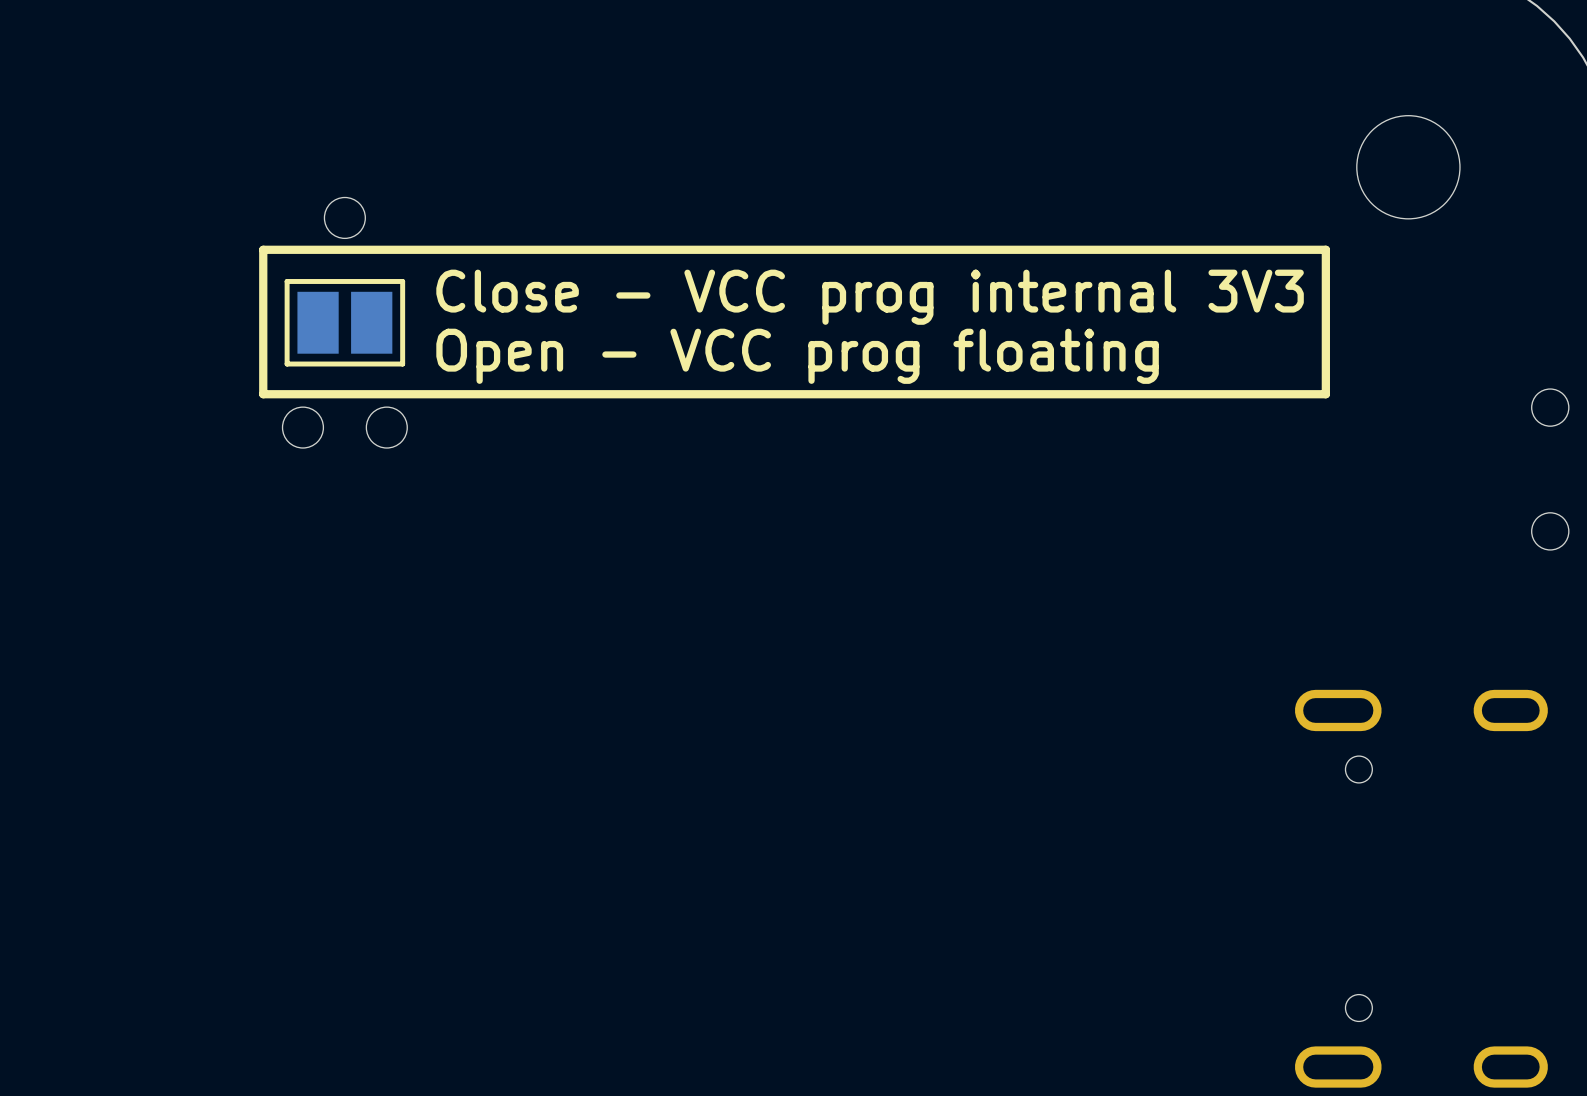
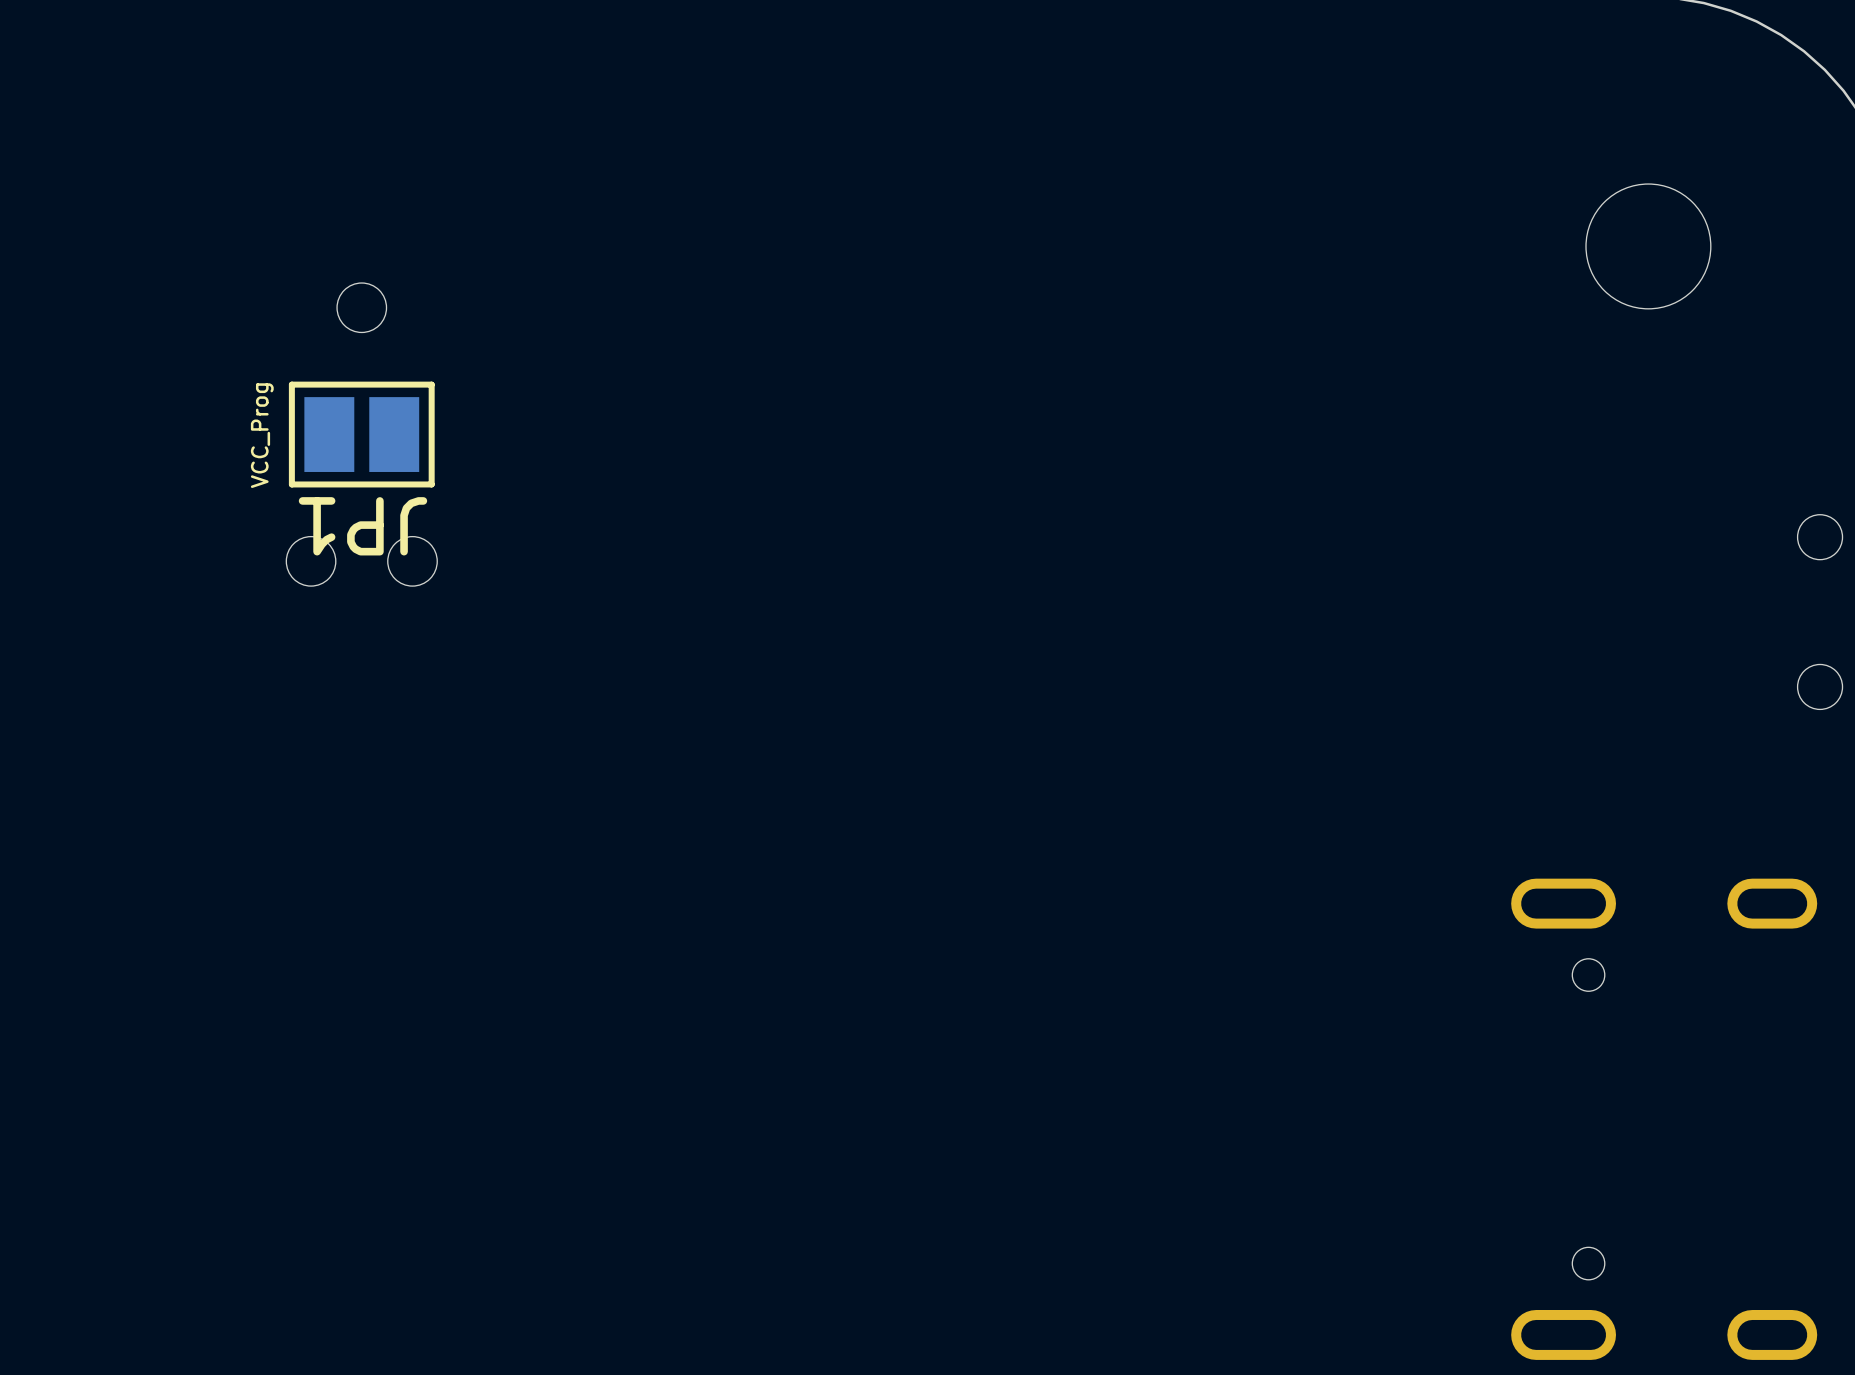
line: (1325, 249) (263, 249) (263, 394) (1325, 394) (1325, 249) -> none
text: Close - VCC prog internal 3V3 (870, 297) -> none
JP1 value: none -> VCC_Prog (262, 435)
text: Open - VCC prog floating (797, 356) -> none
JP1 name: none -> JP1 (362, 526)

